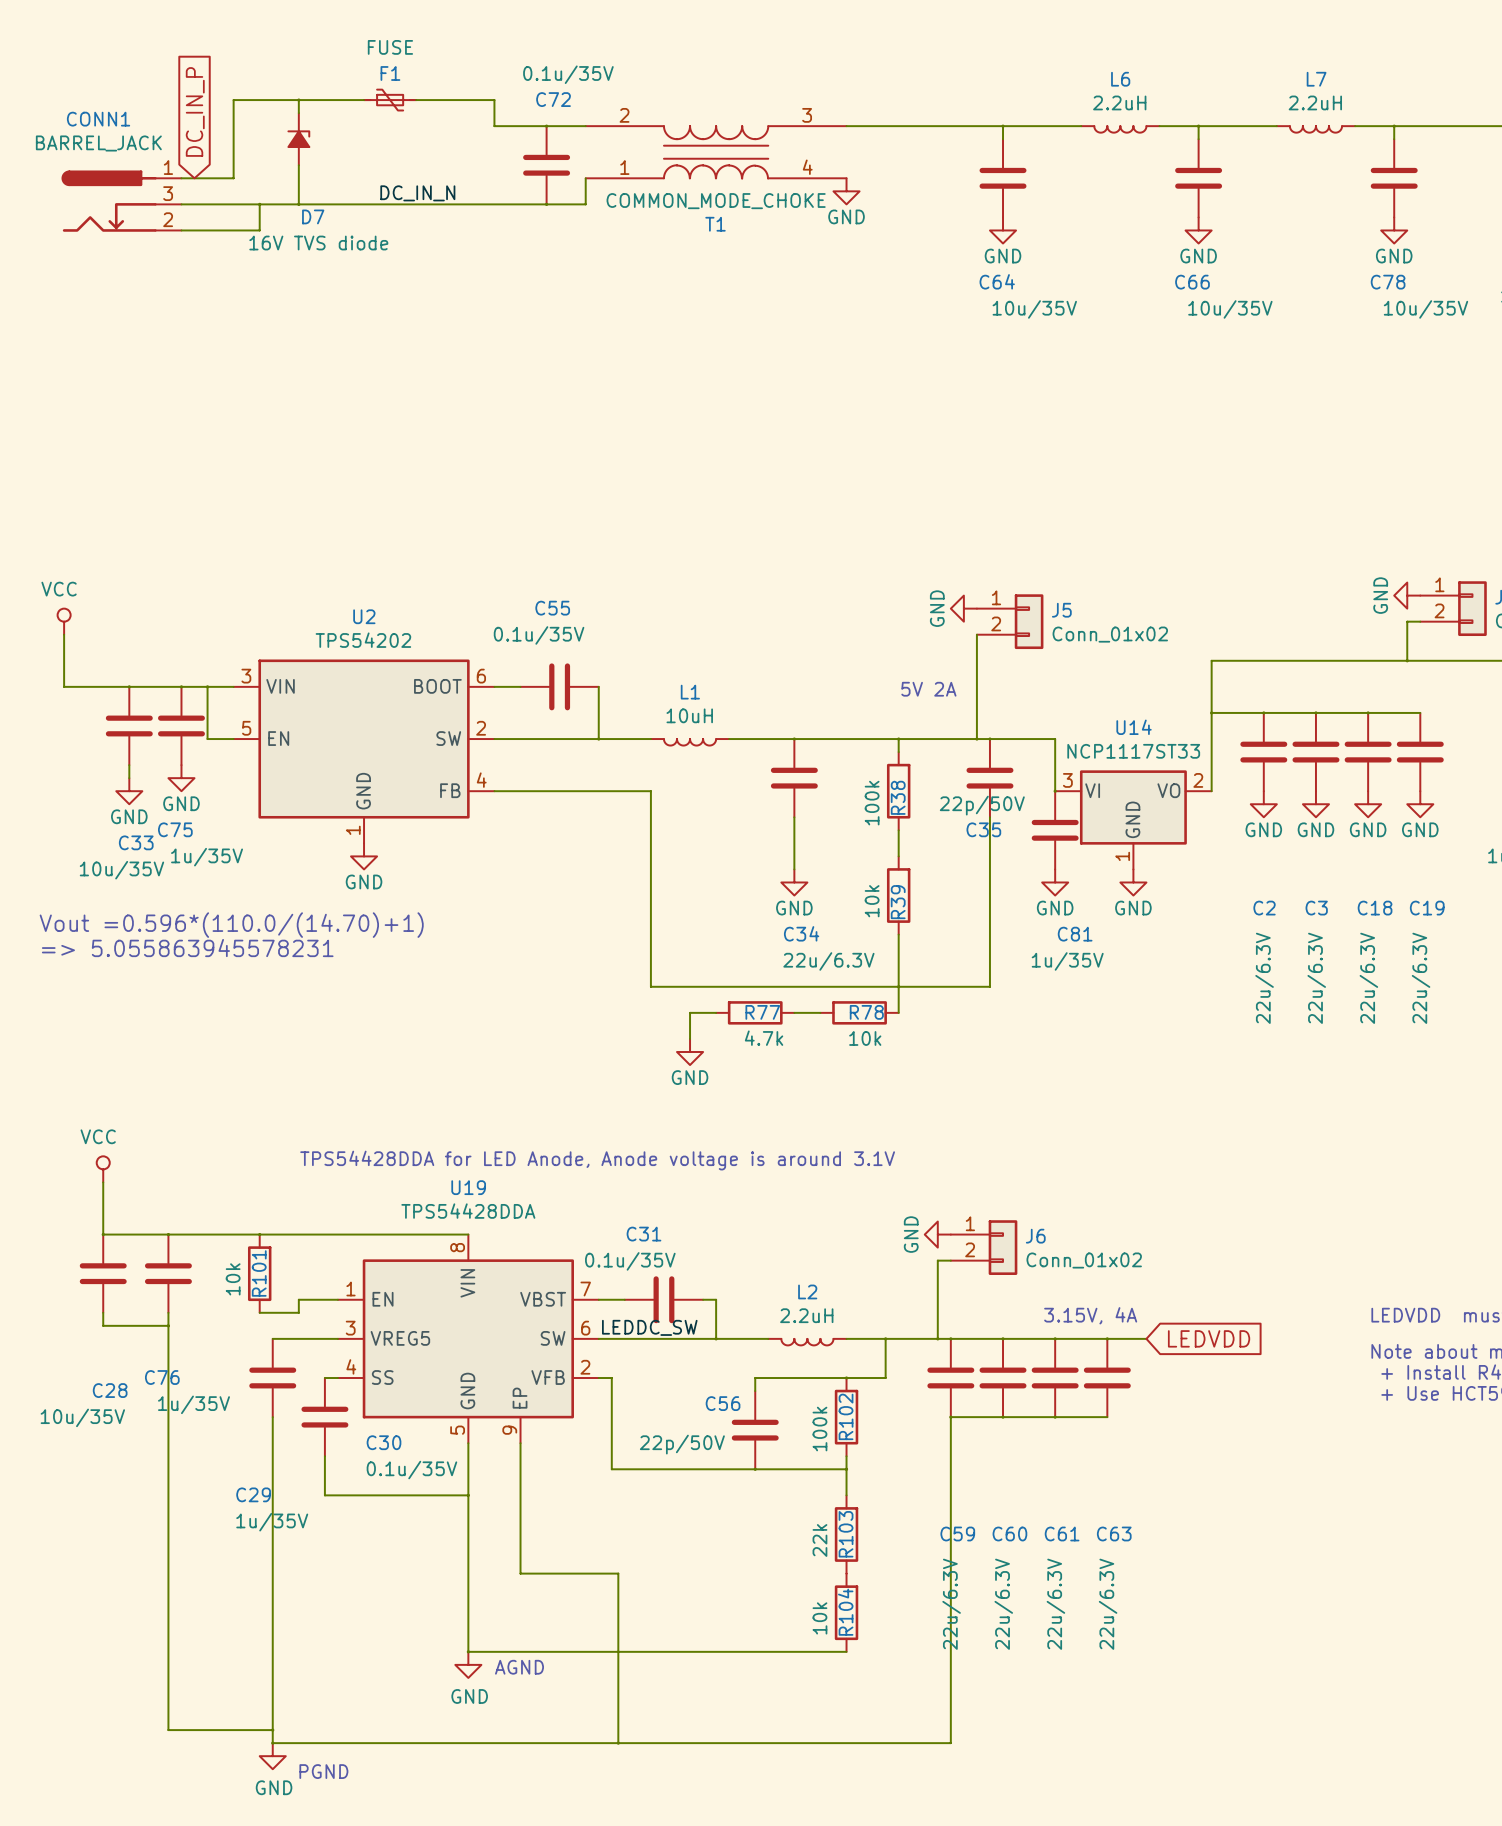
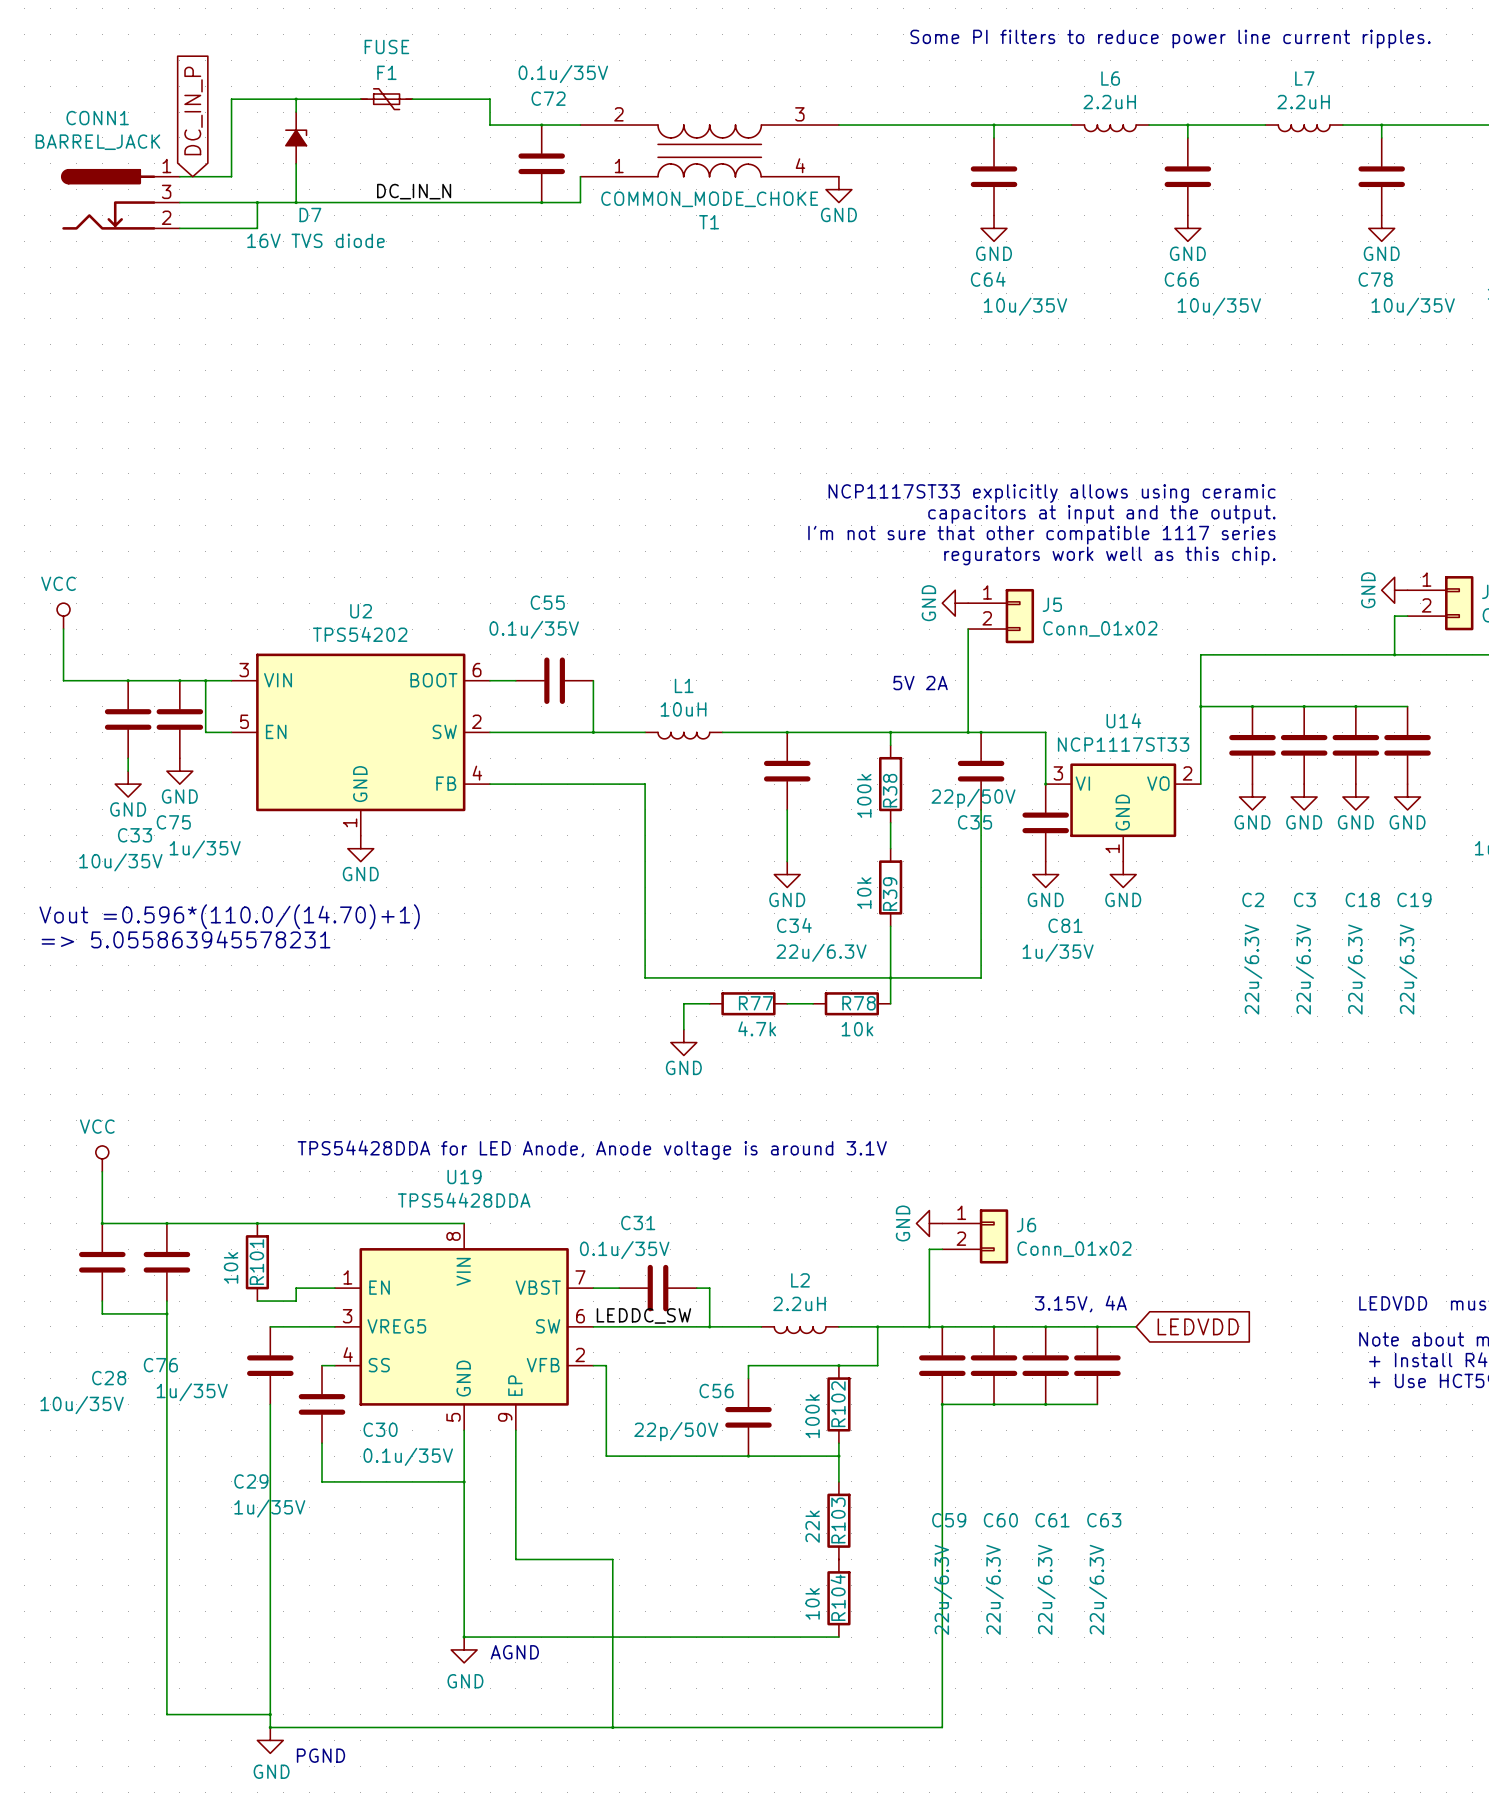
text: none -> Some PI filters to reduce power line current ripples. (1170, 39)
text: none -> NCP1117ST33 explicitly allows using ceramic (1052, 493)
text: none -> capacitors at input and the output. (1101, 514)
text: none -> I'm not sure that other compatible 1117 series (1041, 535)
text: none -> regurators work well as this chip. (1109, 555)

